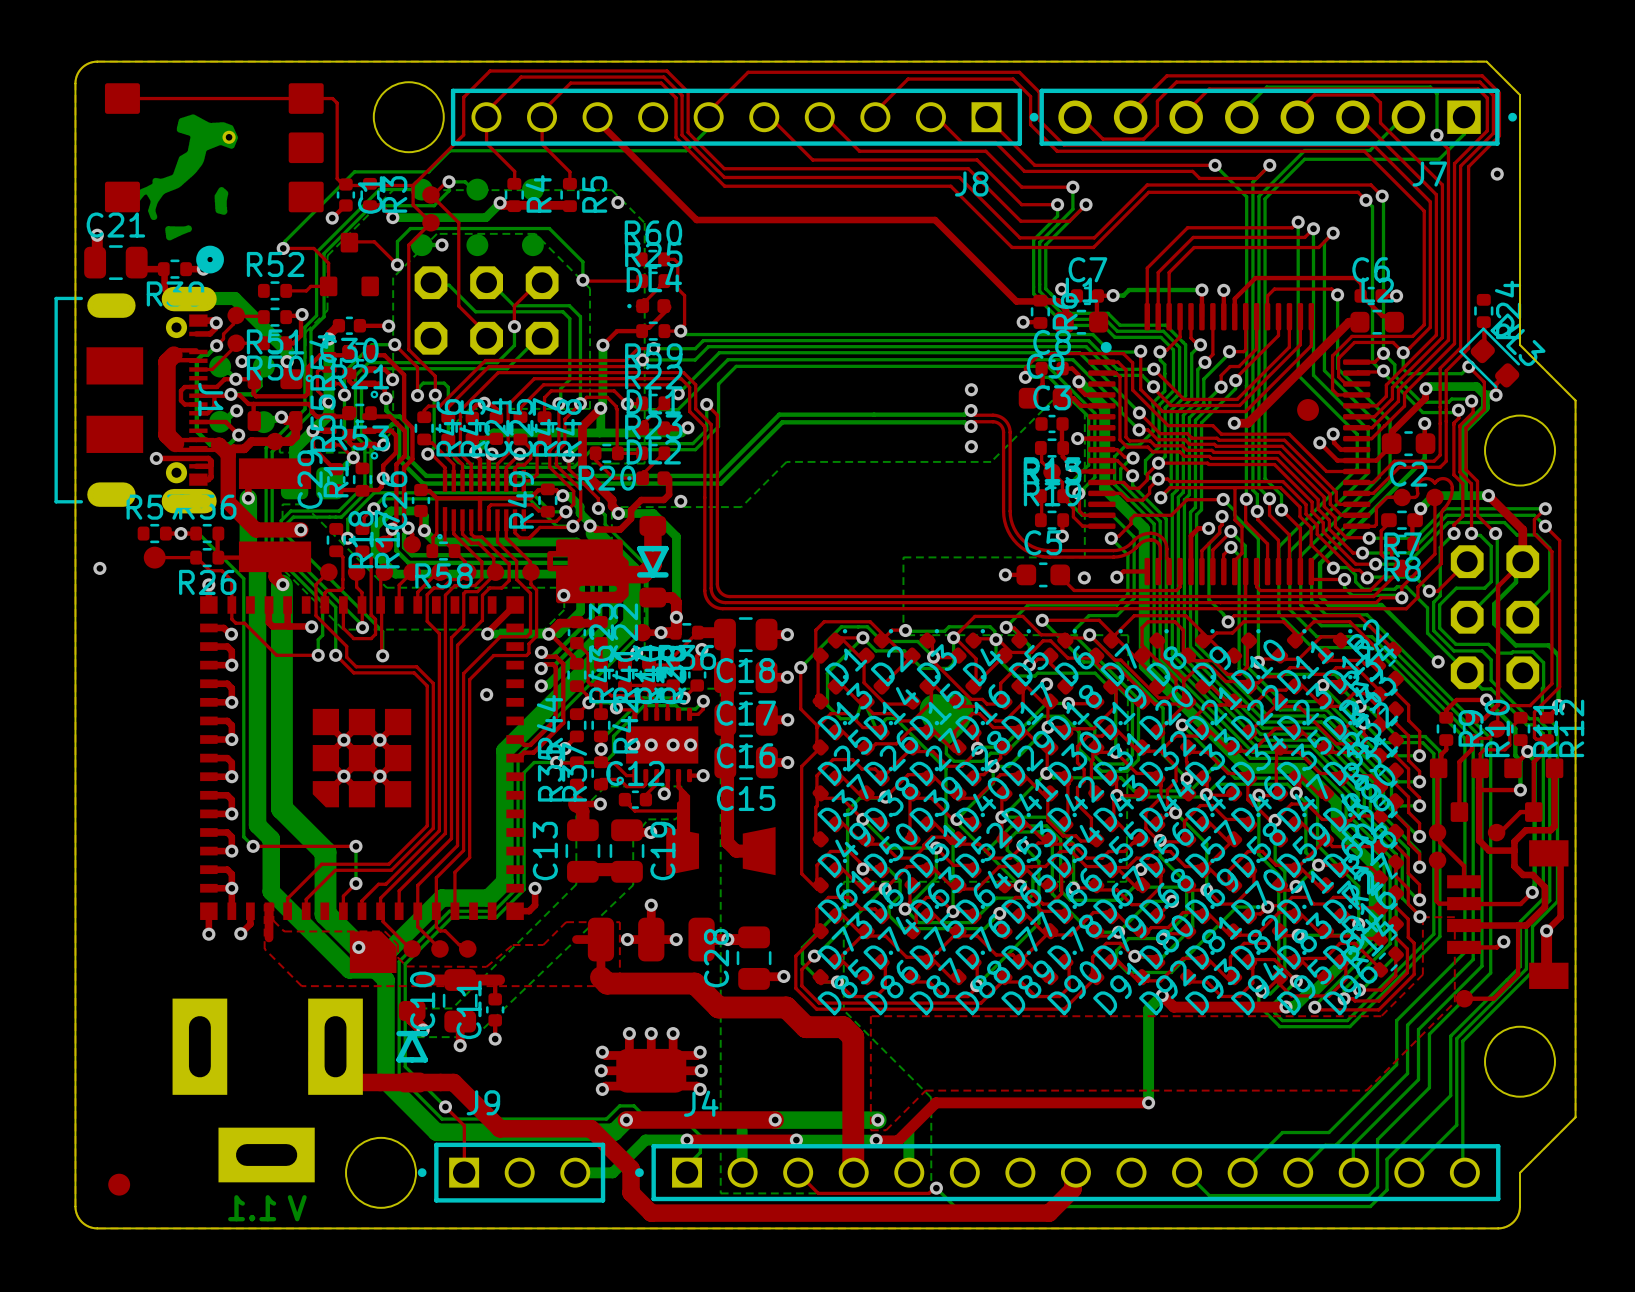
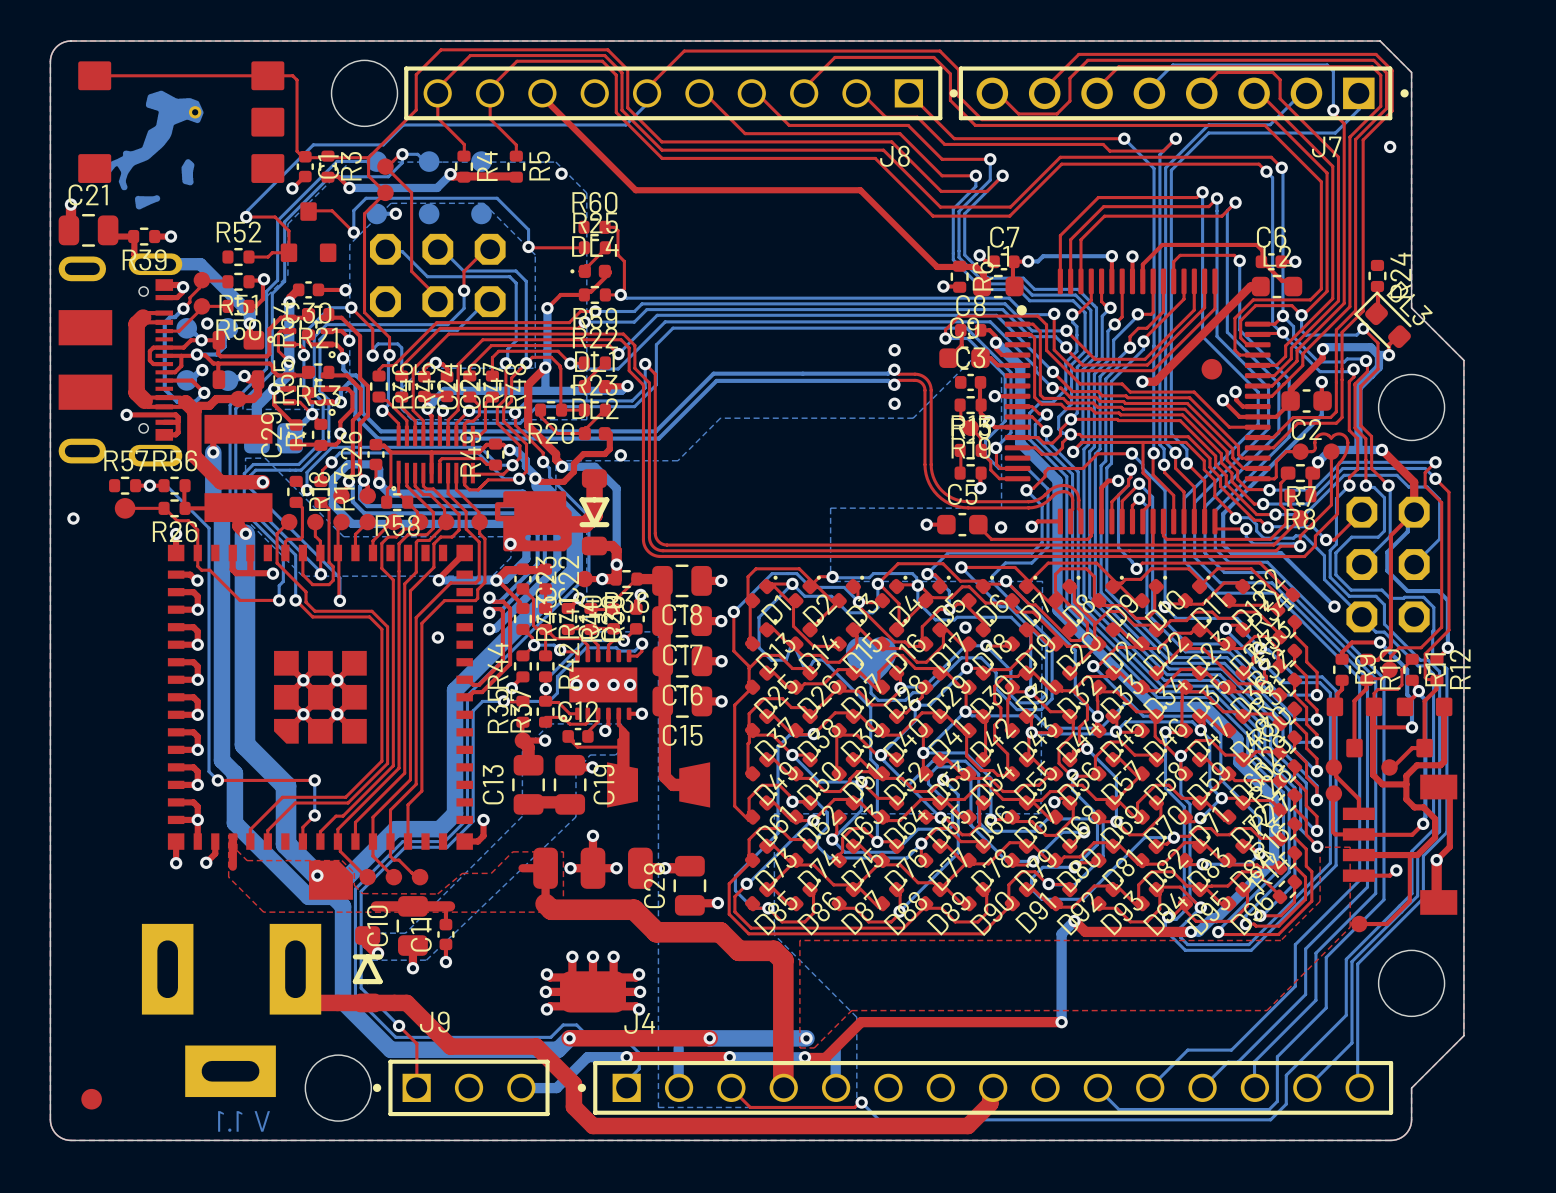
J1: (139, 379) -> none
part: none -> (120, 359)

